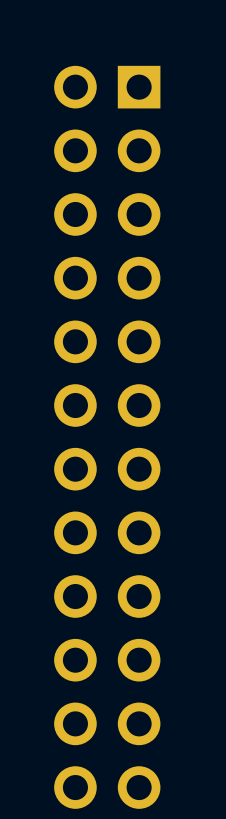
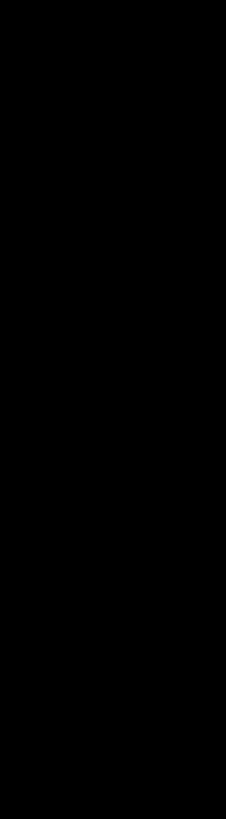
part: (107, 437) -> none

